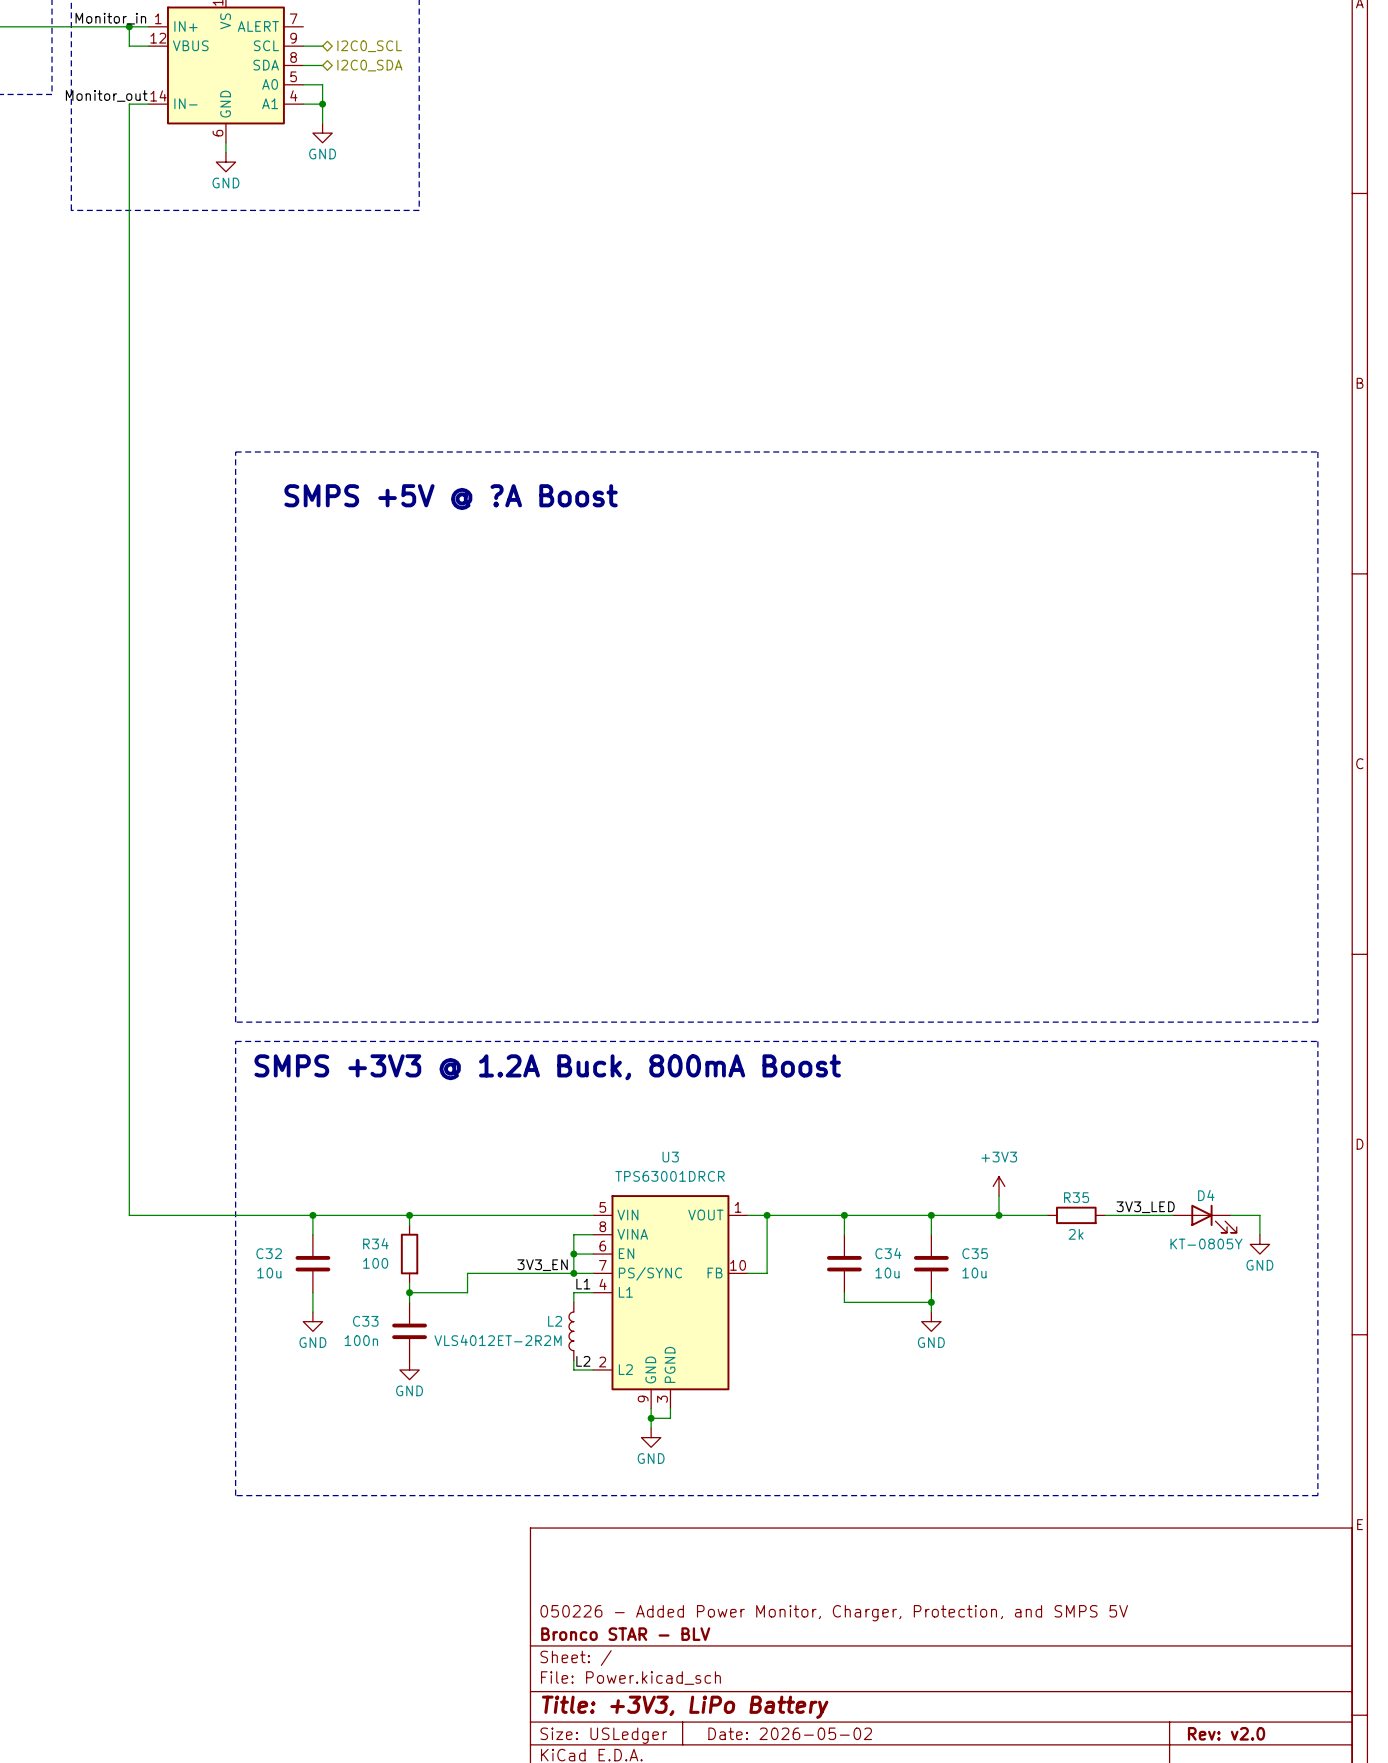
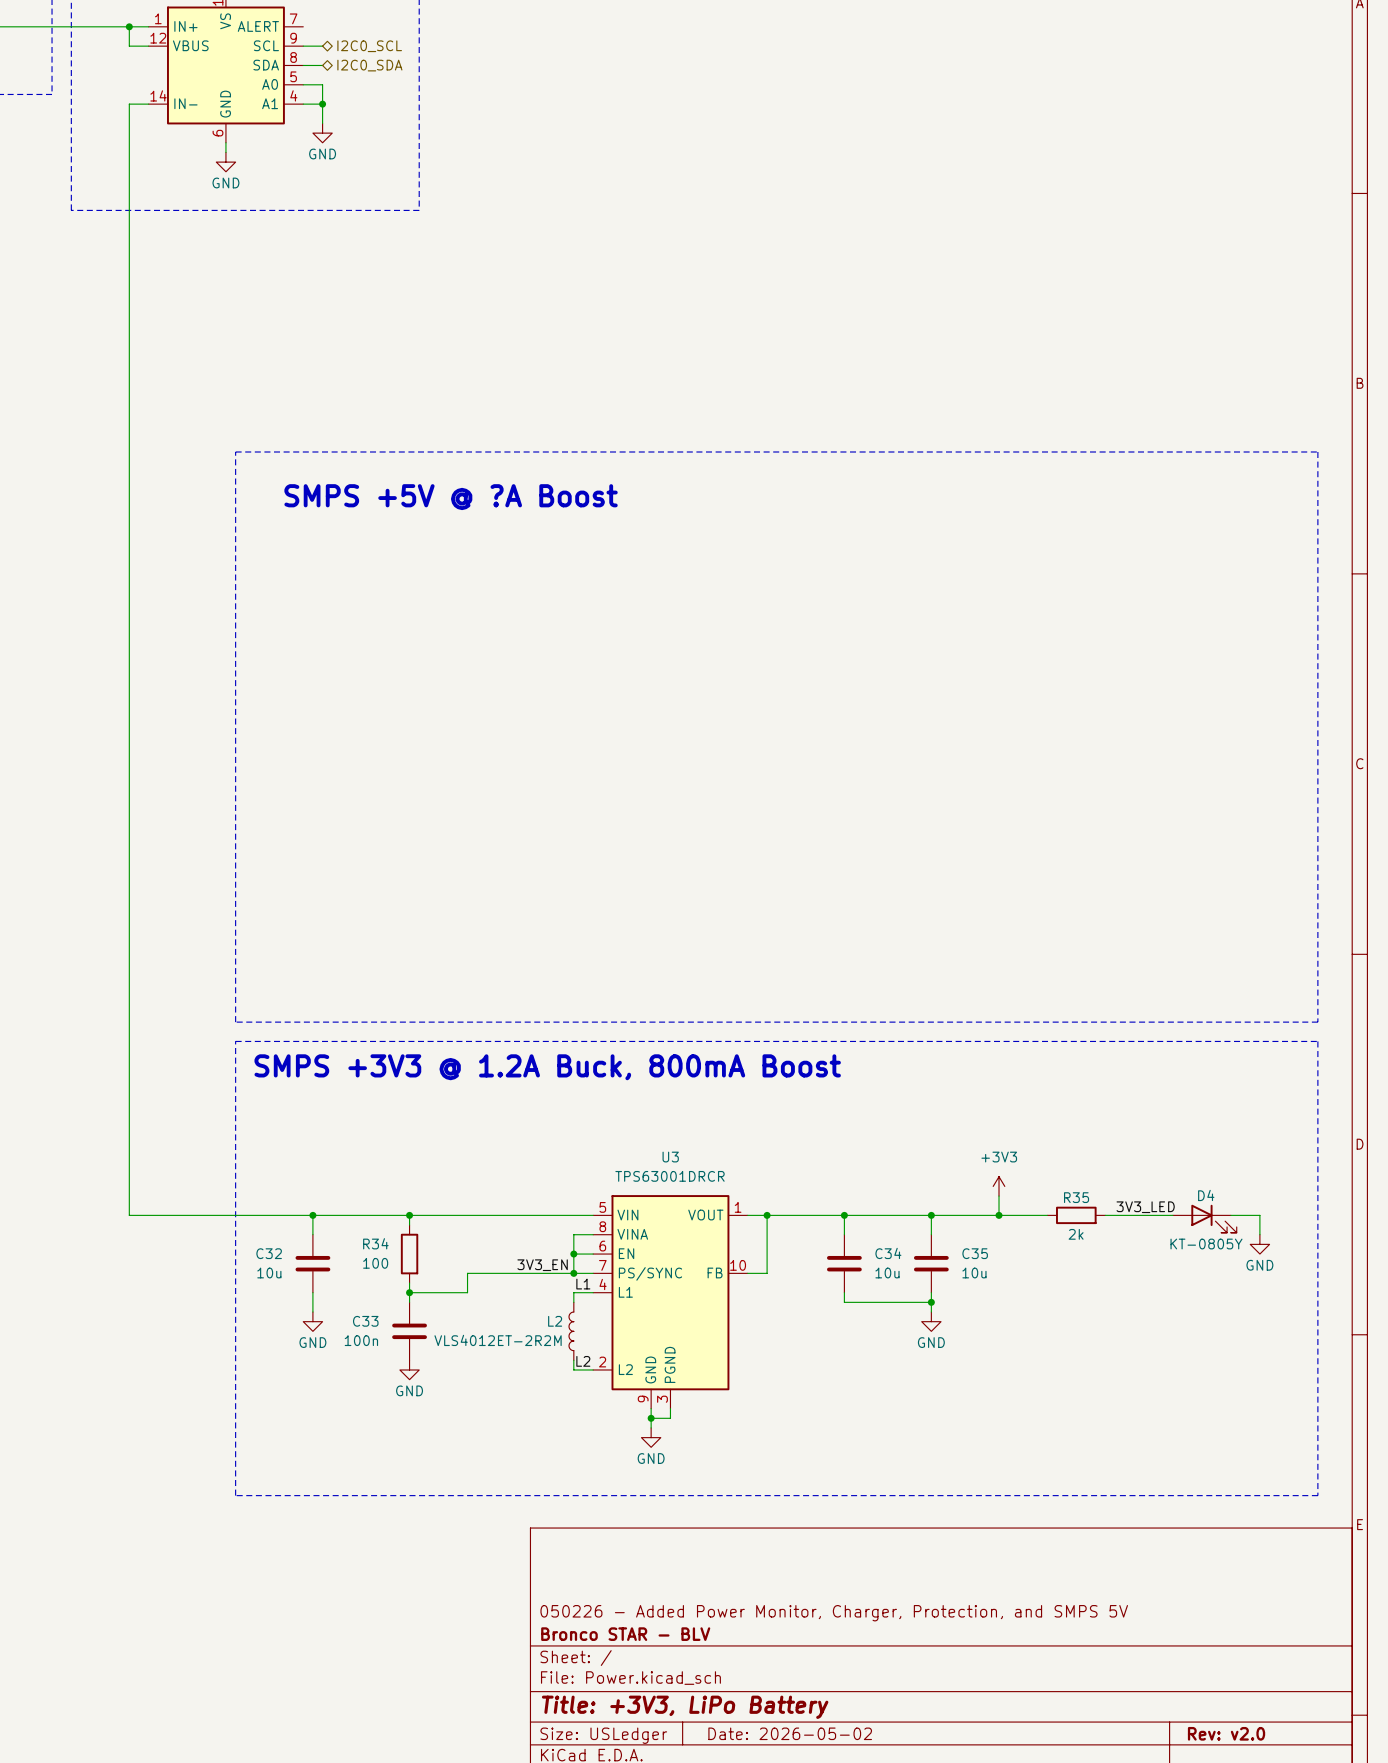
label: Monitor_in (110, 18) -> none
label: Monitor_out (106, 95) -> none

